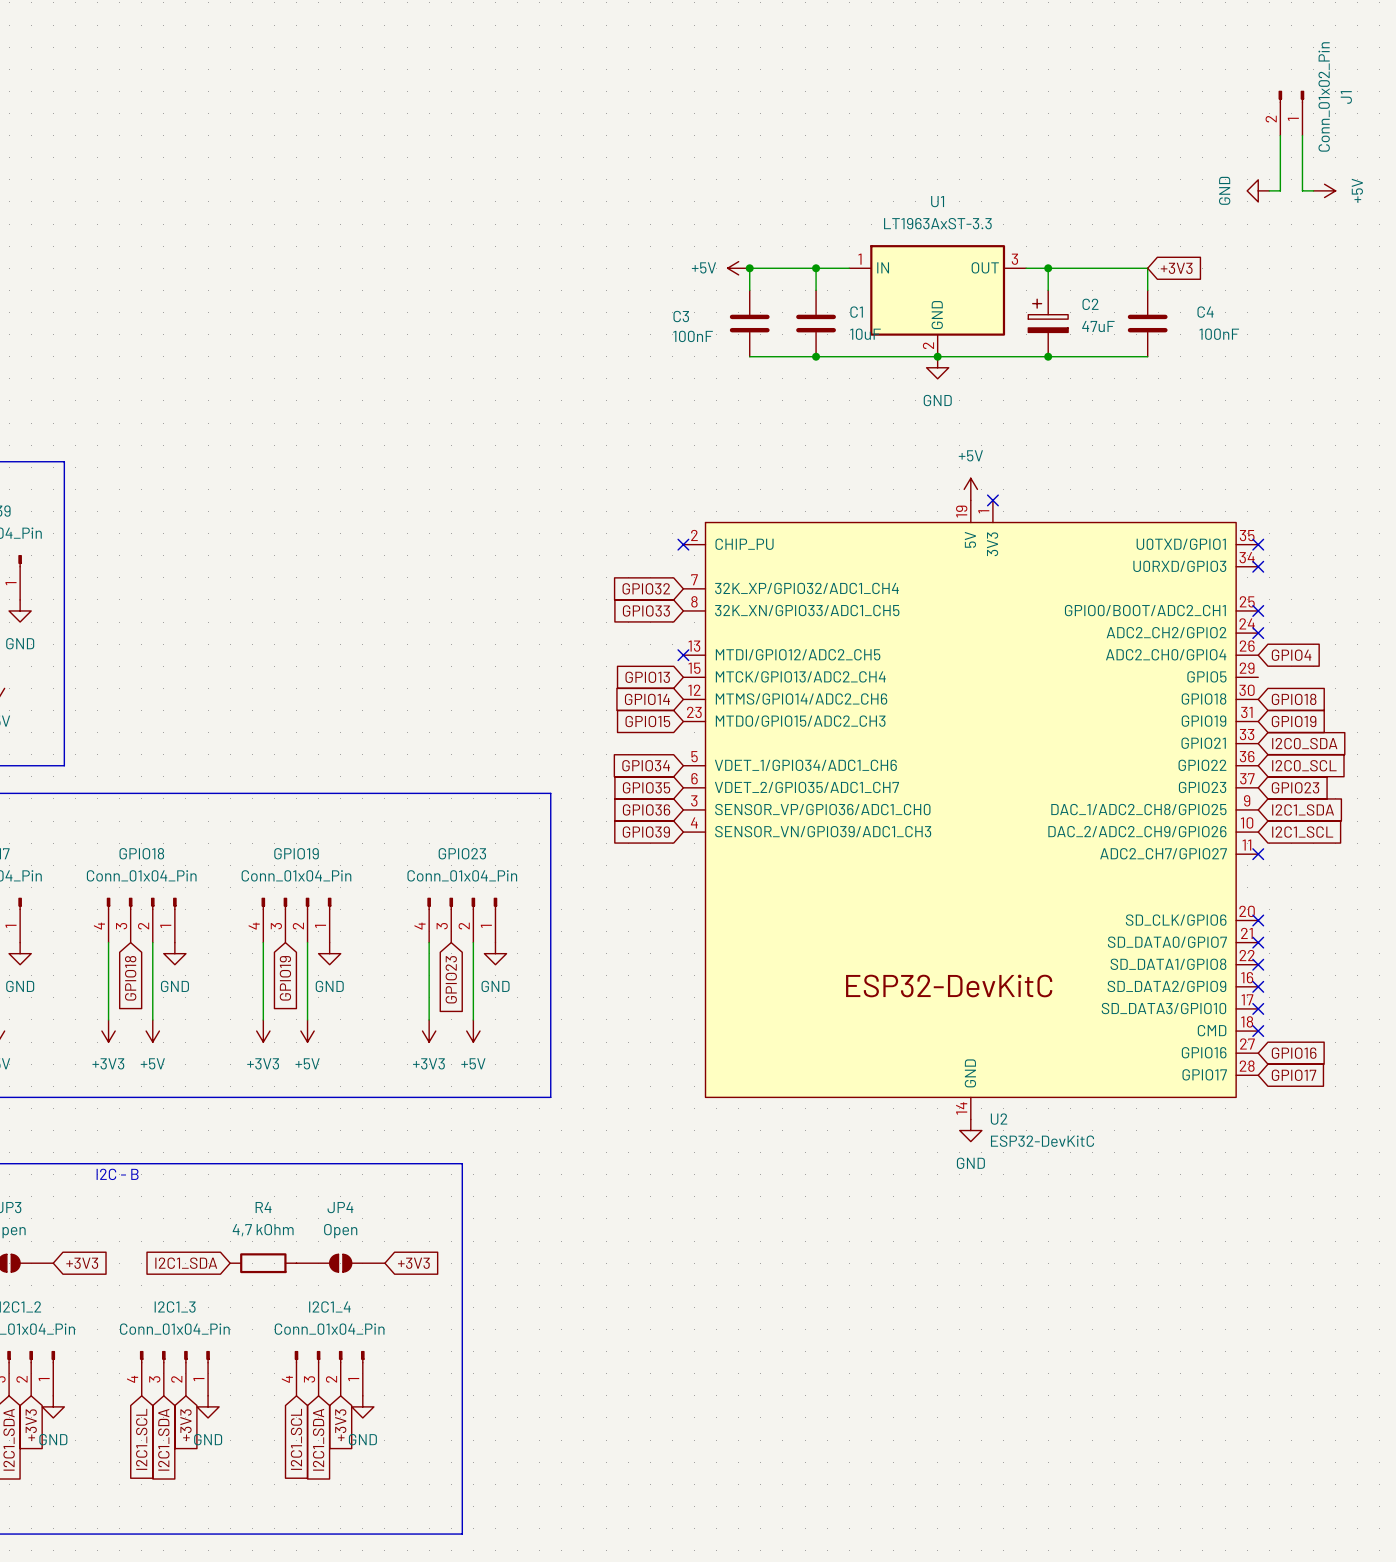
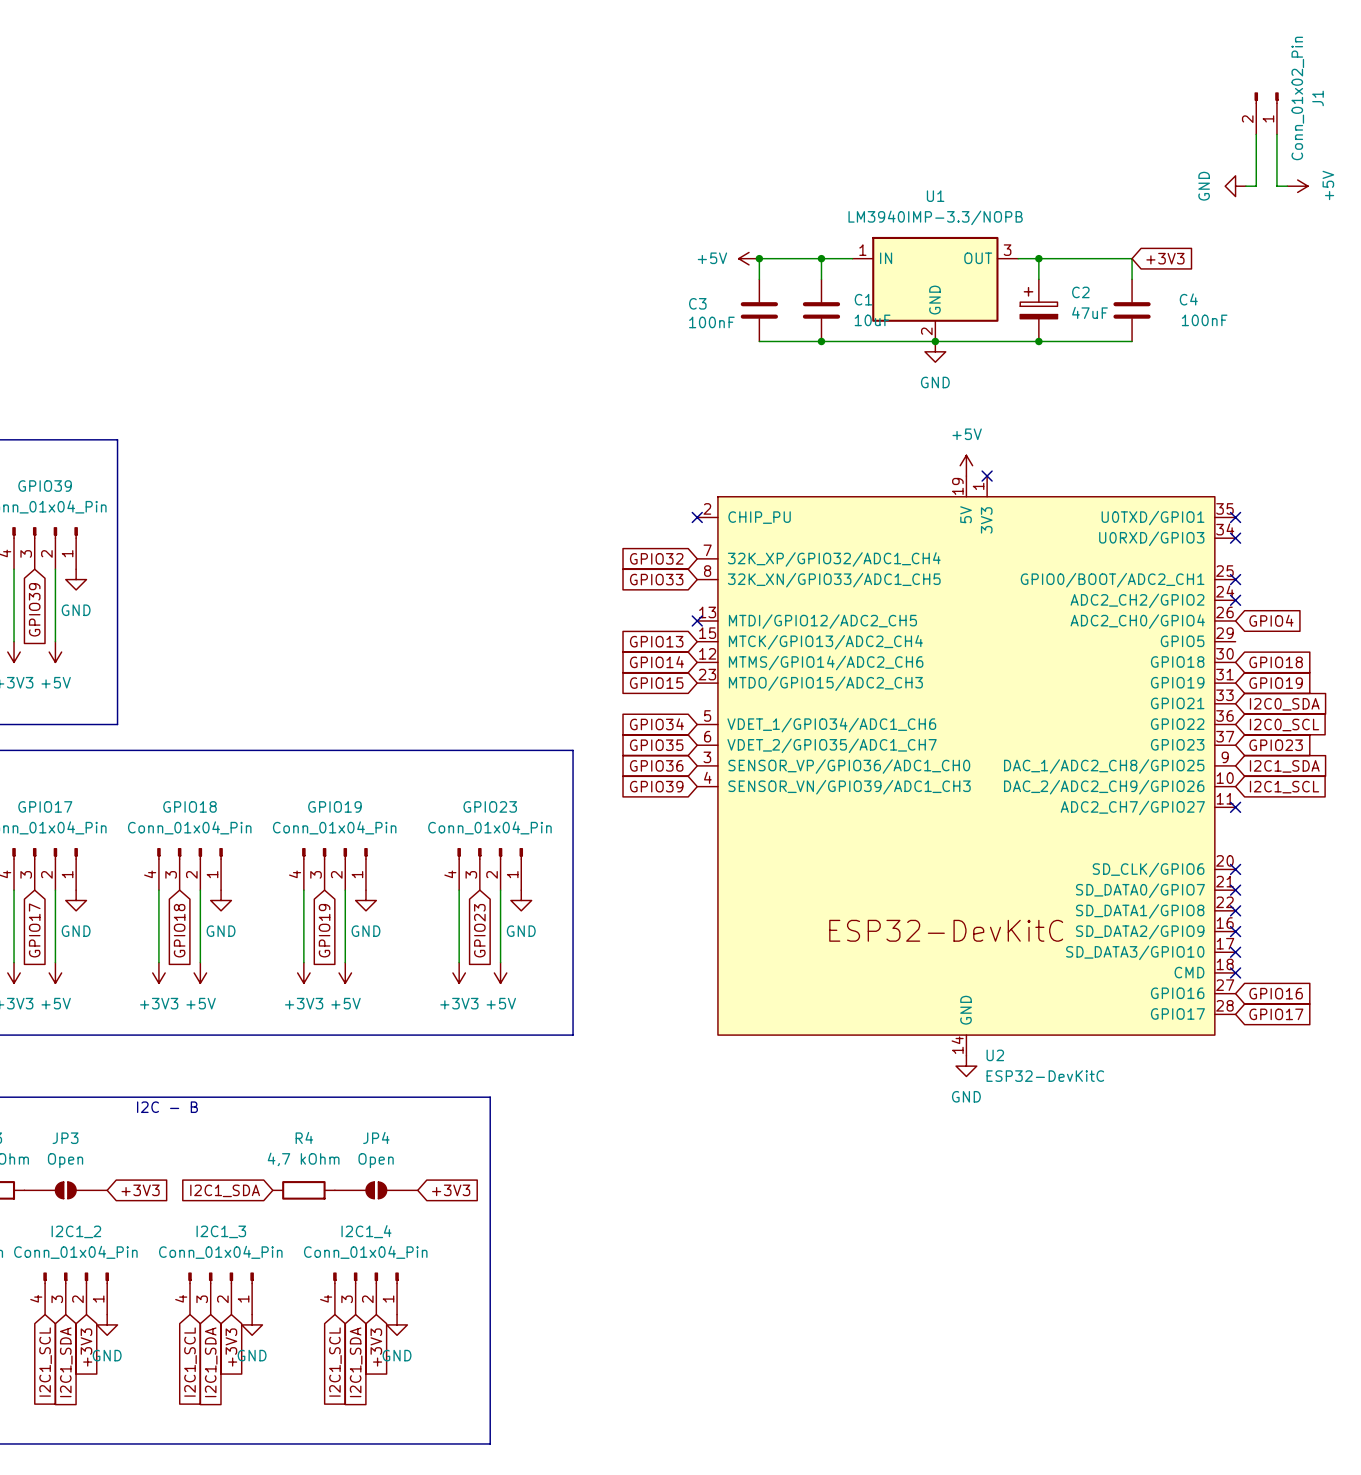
U1 value: LT1963AxST-3.3 (937, 223) -> LM3940IMP-3.3/NOPB (935, 217)

